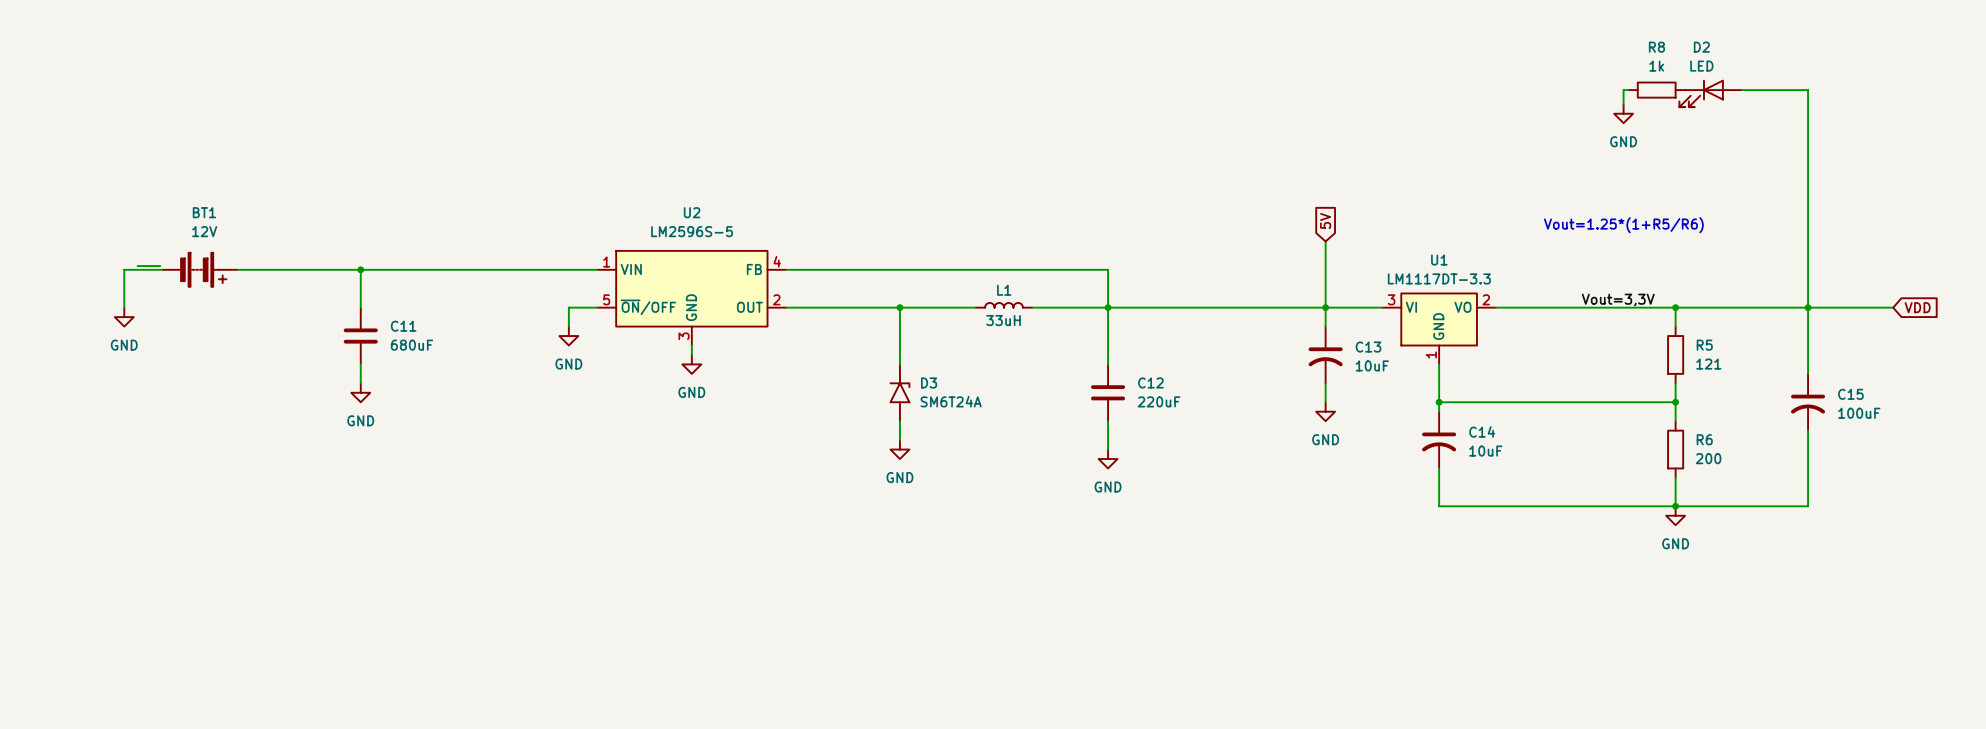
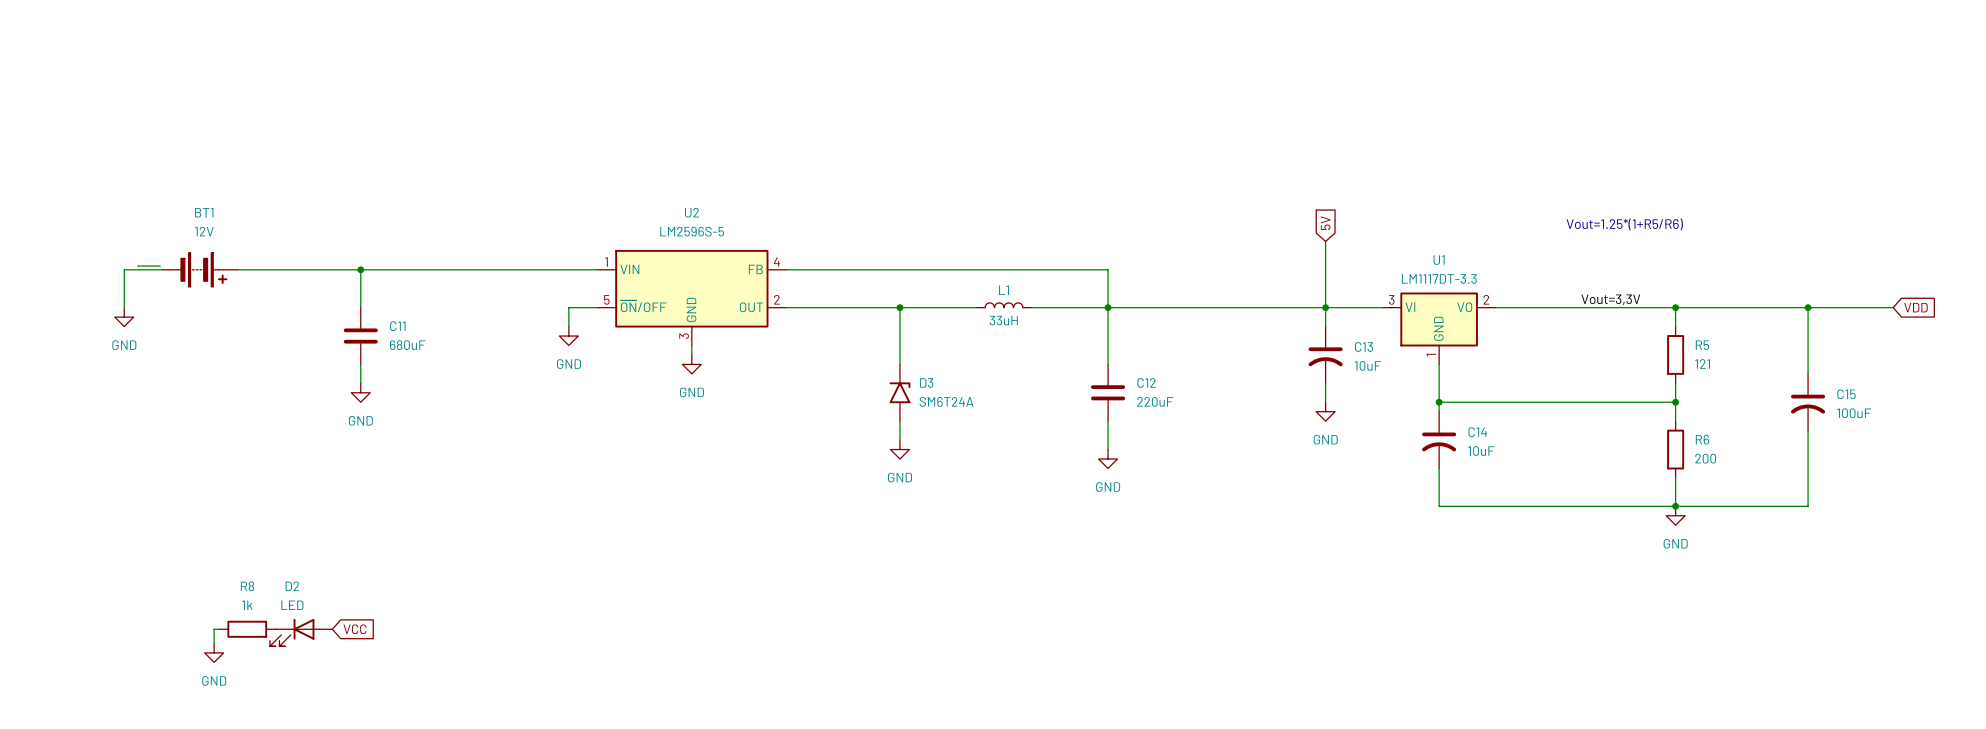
wire: (1628, 90) (1623, 90) (1623, 104) -> none
R8 position: (1656, 90) -> (247, 629)
wire: (1741, 90) (1808, 90) (1808, 307) -> none
D2 position: (1710, 93) -> (301, 632)
power symbol: GND (1623, 113) -> none
wire: none -> (218, 629) (214, 629) (214, 643)
global label: none -> VCC (355, 629)
power symbol: none -> GND (214, 652)

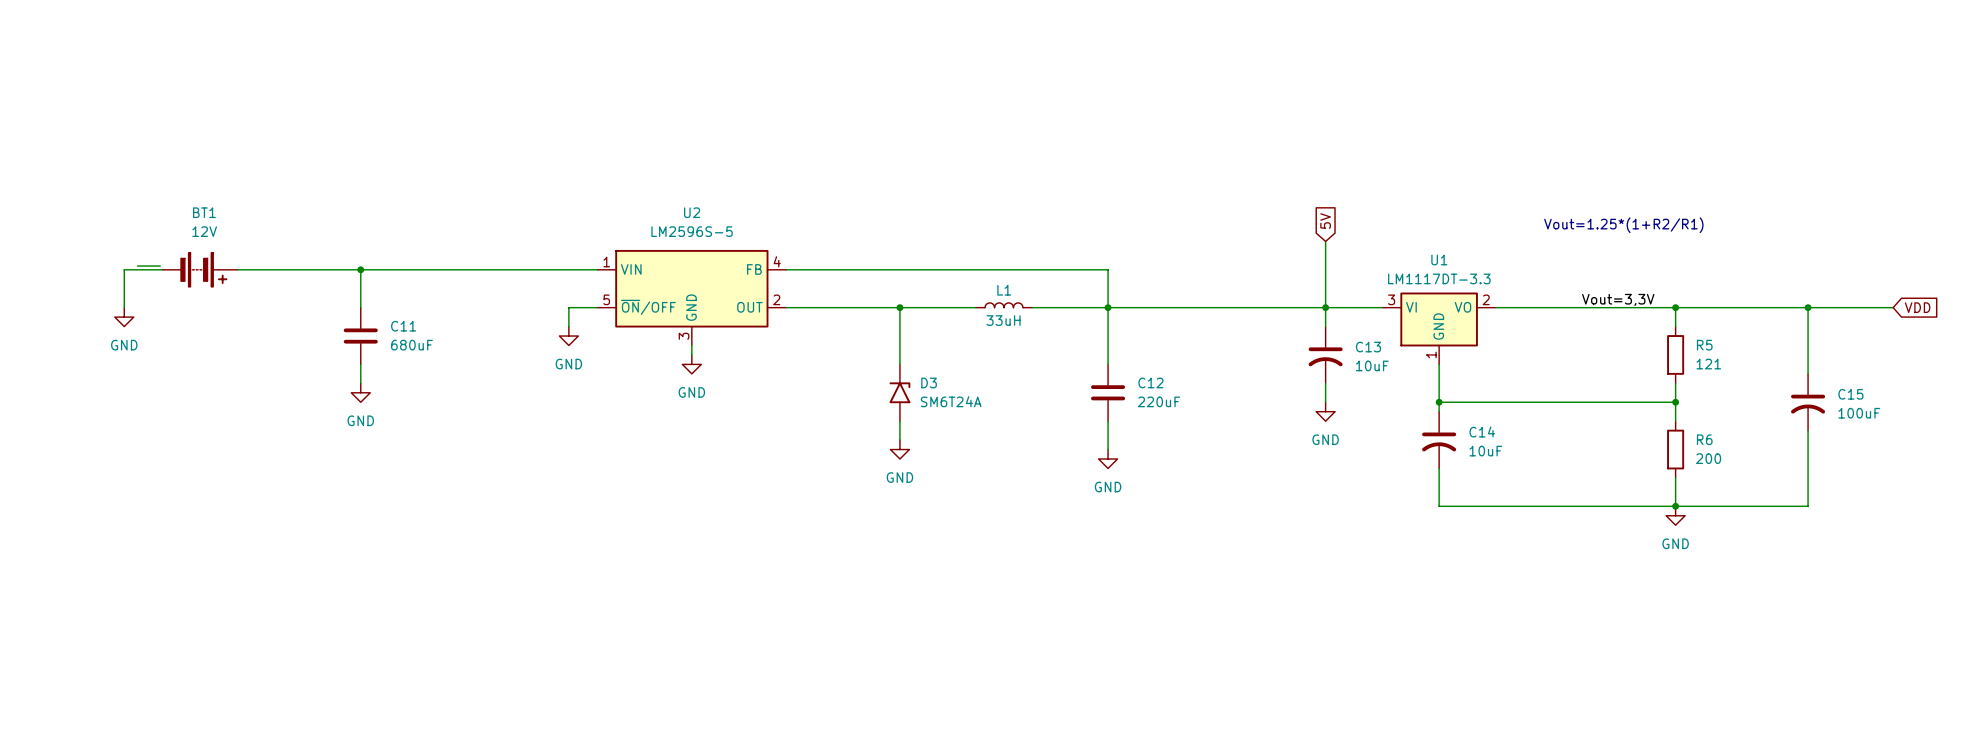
text: Vout=1.25*(1+R5/R6) (1624, 224) -> Vout=1.25*(1+R2/R1) (1623, 225)
wire: (218, 629) (214, 629) (214, 643) -> none
R8: 1k (247, 629) -> none
global label: VCC (355, 629) -> none
D2: LED (301, 632) -> none
power symbol: GND (214, 652) -> none

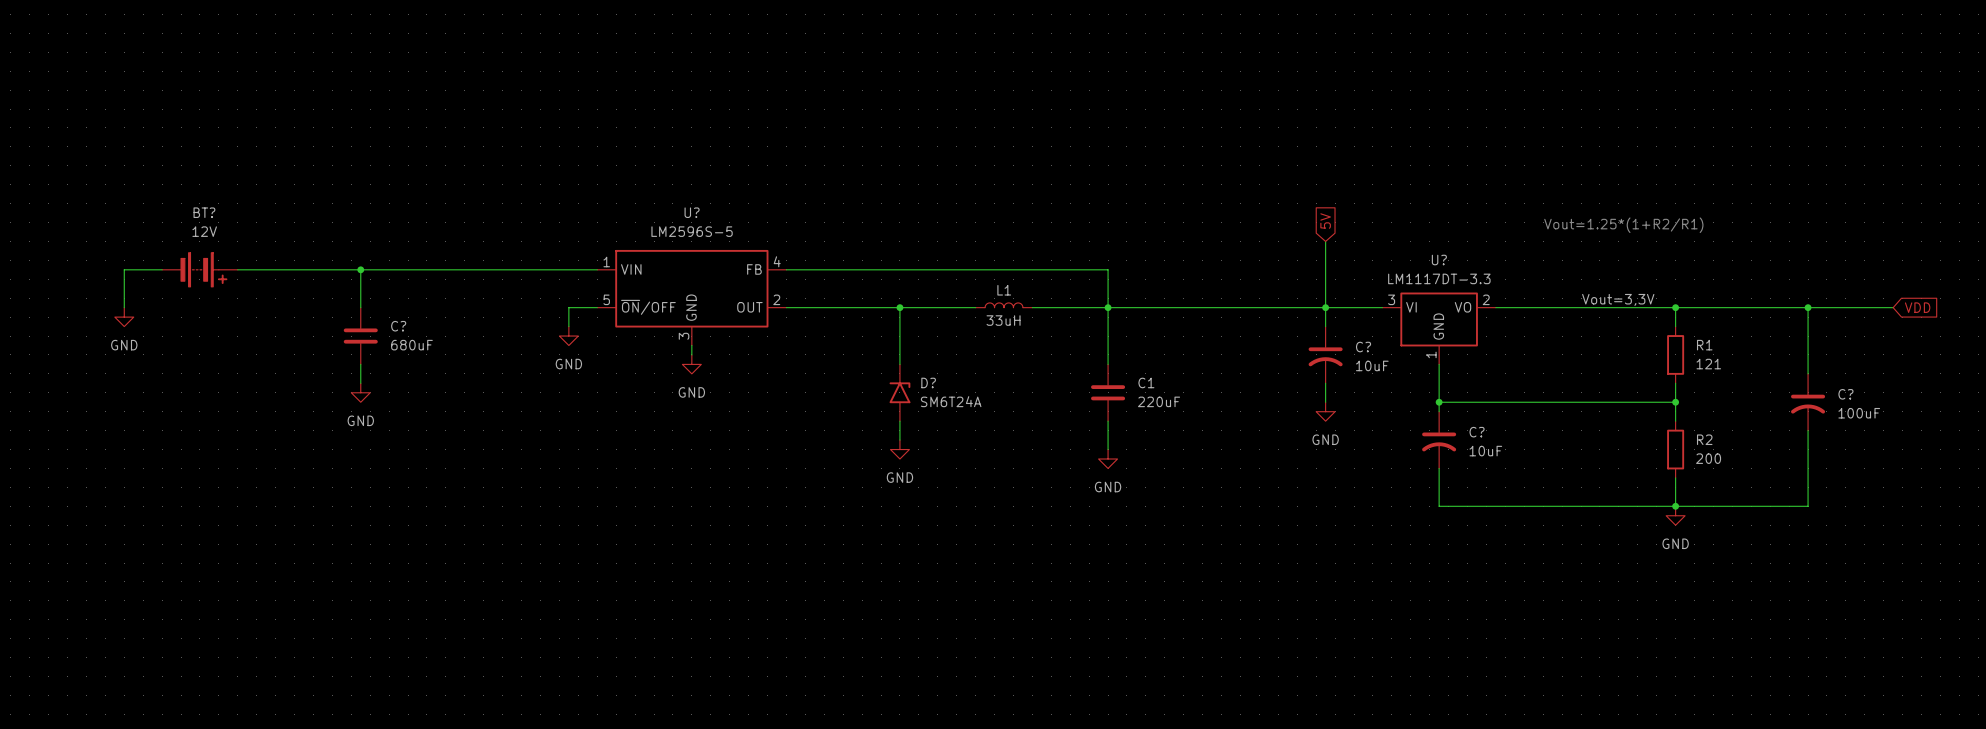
BT1 name: BT1 (204, 212) -> BT? (204, 212)
U2 name: U2 (692, 212) -> U? (692, 212)
U1 name: U1 (1439, 260) -> U? (1439, 260)
wire: (137, 266) (160, 266) -> none
C11 name: C11 (403, 326) -> C? (398, 326)
R5 name: R5 (1704, 345) -> R1 (1704, 345)
C13 name: C13 (1368, 347) -> C? (1363, 347)
D3 name: D3 (929, 382) -> D? (928, 382)
C12 name: C12 (1150, 382) -> C1 (1146, 382)
C15 name: C15 (1850, 394) -> C? (1845, 394)
C14 name: C14 (1482, 431) -> C? (1477, 432)
R6 name: R6 (1704, 439) -> R2 (1704, 439)

